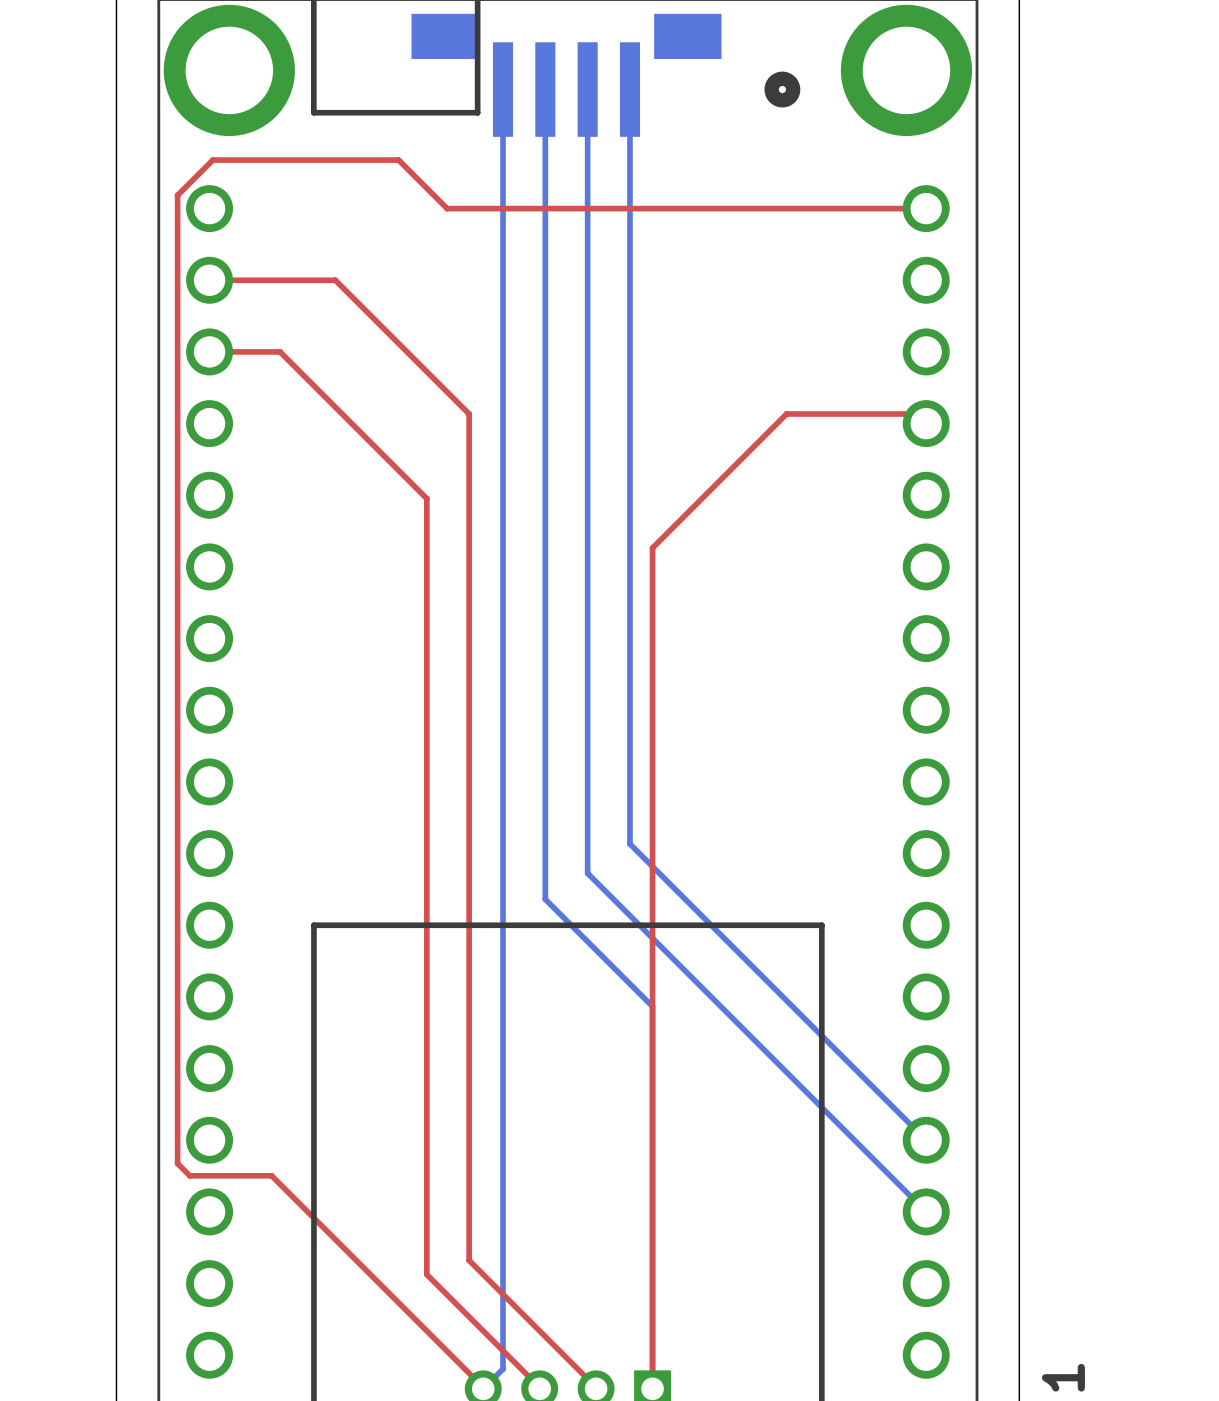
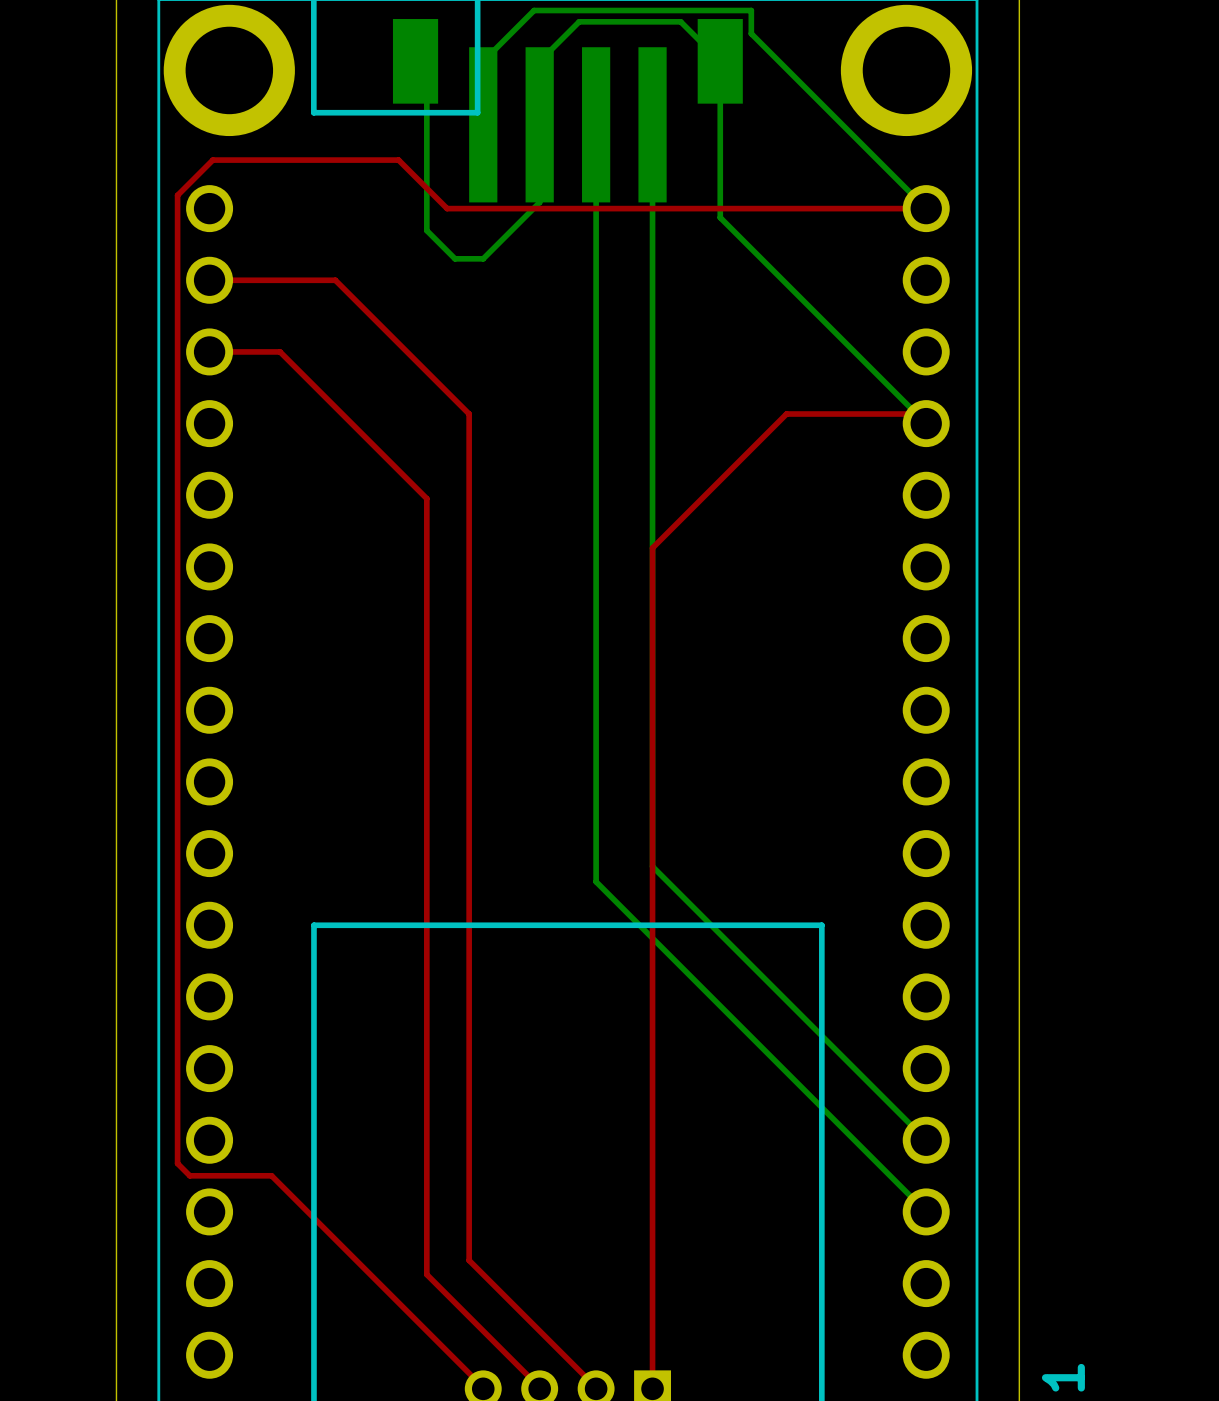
bottom track: none -> (415, 61) (426, 72) (426, 230) (455, 258) (483, 258) (539, 202) (539, 61) (579, 21) (680, 21) (720, 61) (720, 217) (926, 423)
part: (605, 75) -> none
bottom track: (503, 89) (503, 1369) (483, 1388) -> none
bottom track: (545, 89) (545, 899) (652, 1006) (652, 1388) -> none
bottom track: (587, 89) (587, 873) (596, 881) -> (596, 124) (596, 881)
bottom track: (629, 89) (629, 844) (652, 866) -> (652, 124) (652, 866)
part: none -> (567, 110)
bottom track: none -> (483, 124) (483, 61) (534, 10) (751, 10) (751, 33) (926, 208)

